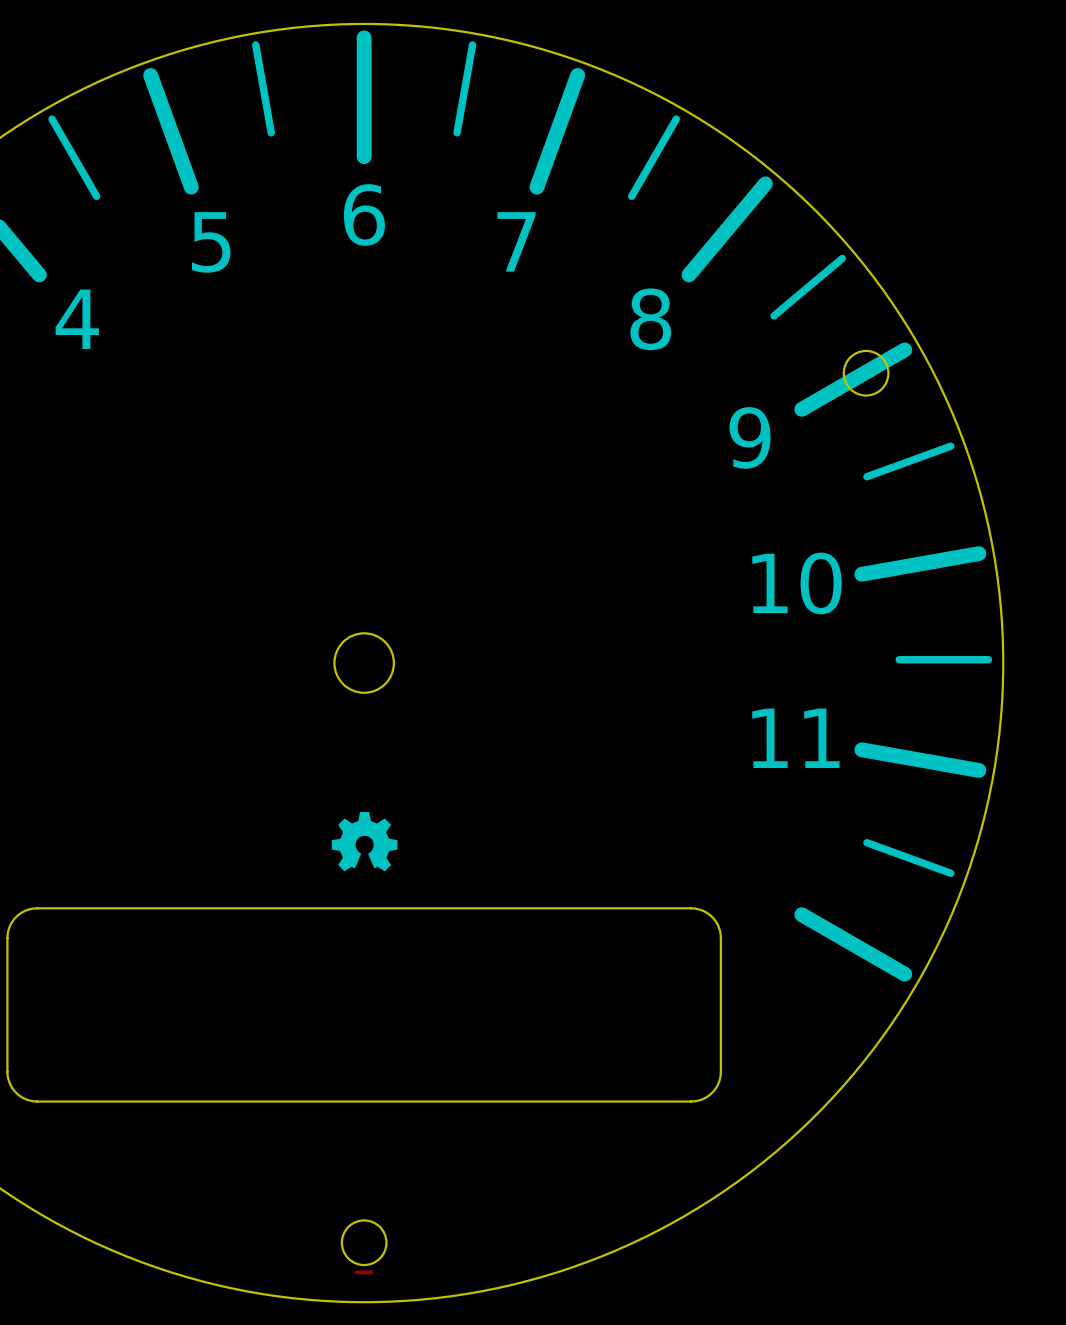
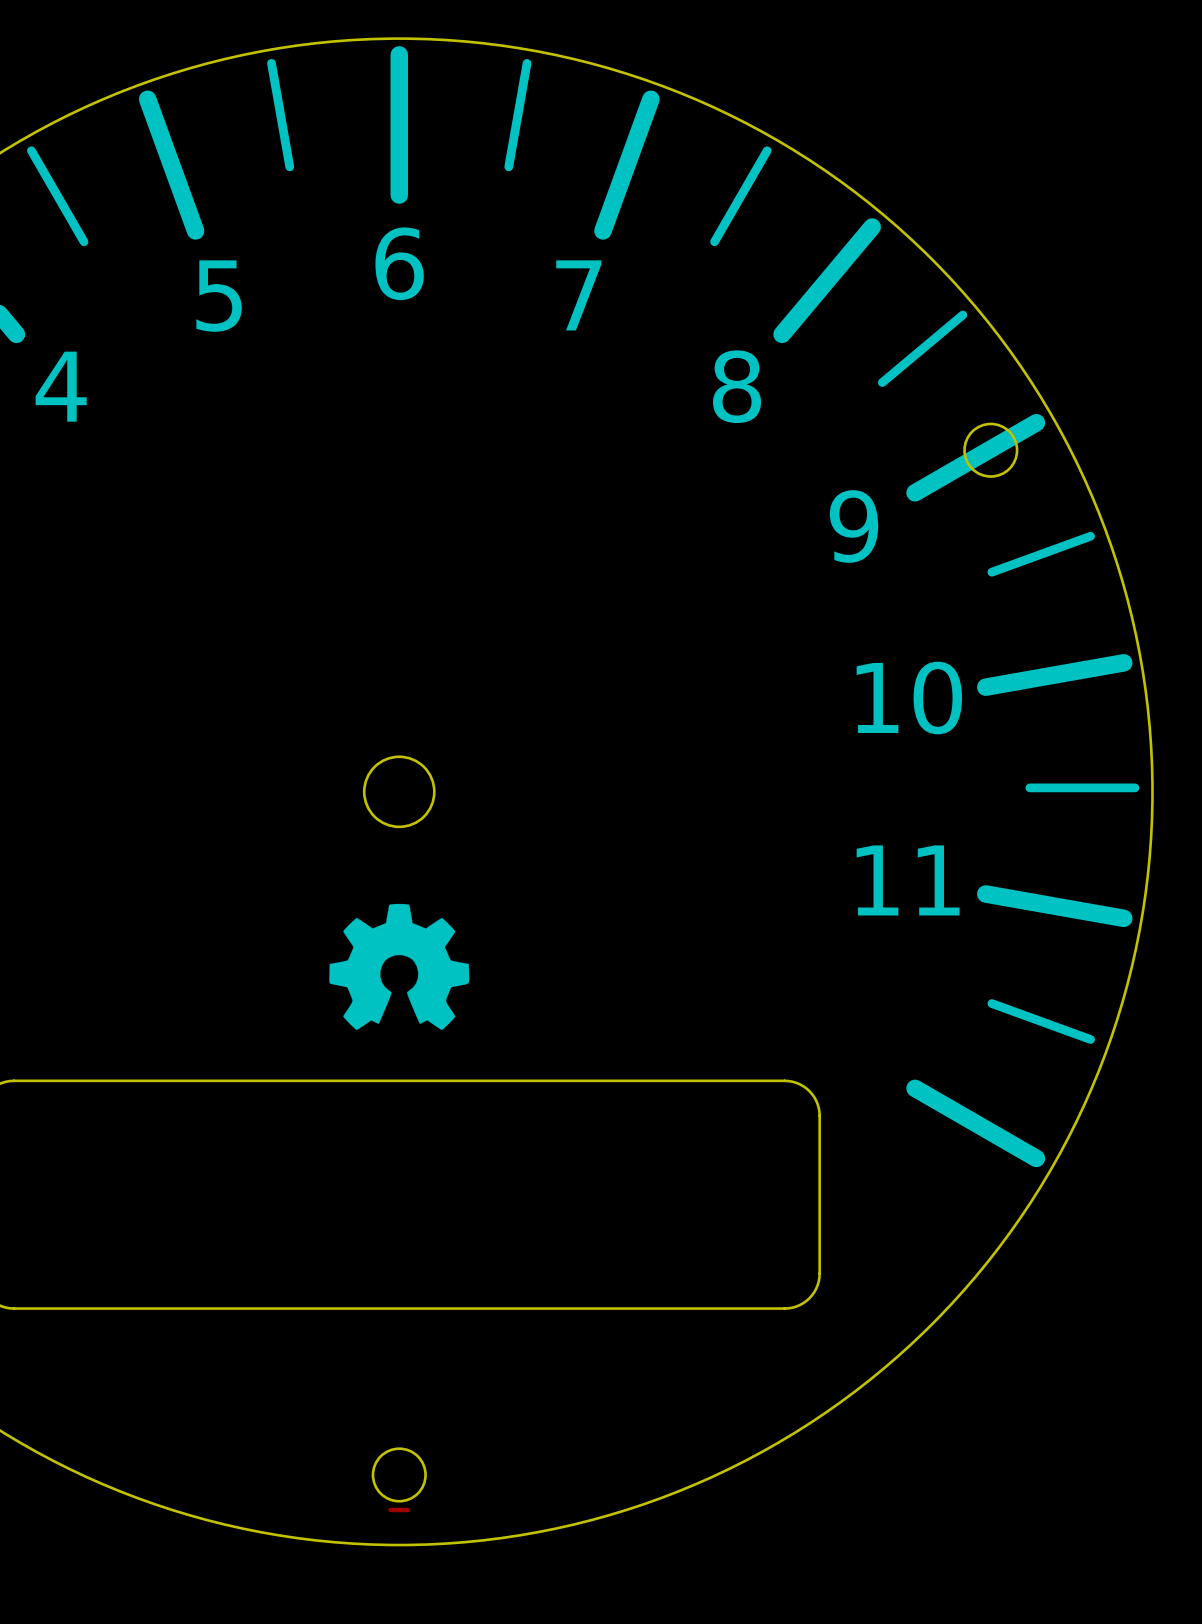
drawing: none -> [329, 903, 470, 1031]
drawing: [331, 811, 398, 872] -> none

